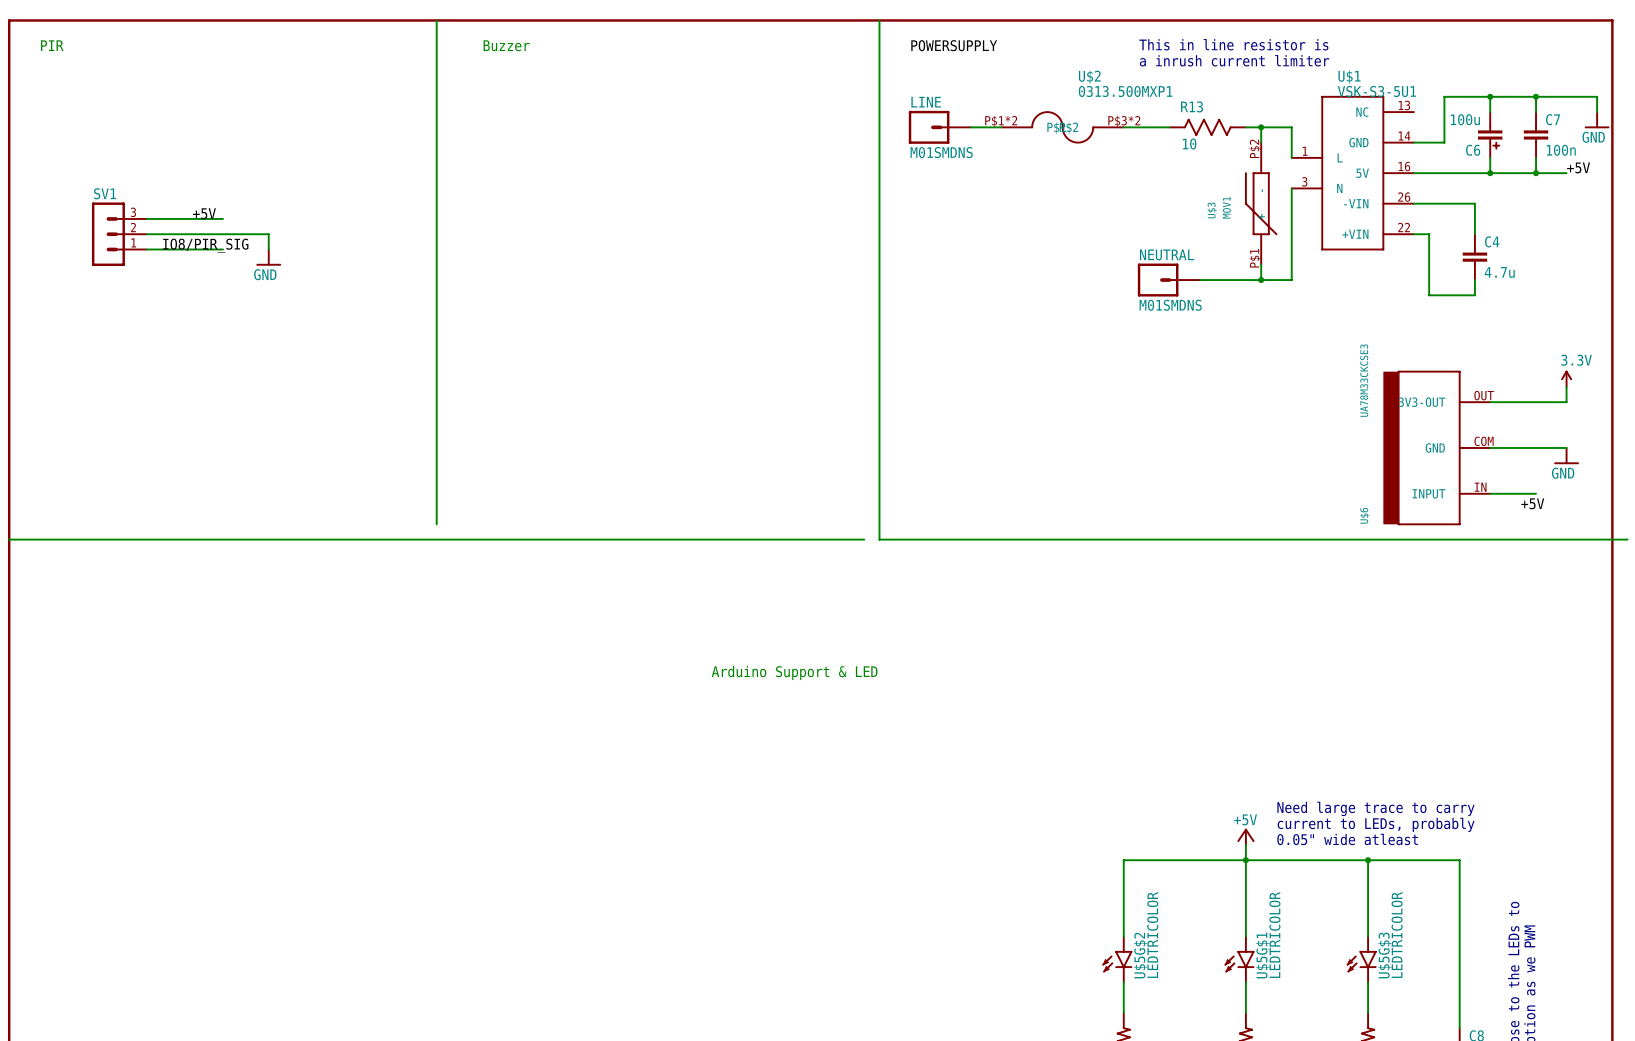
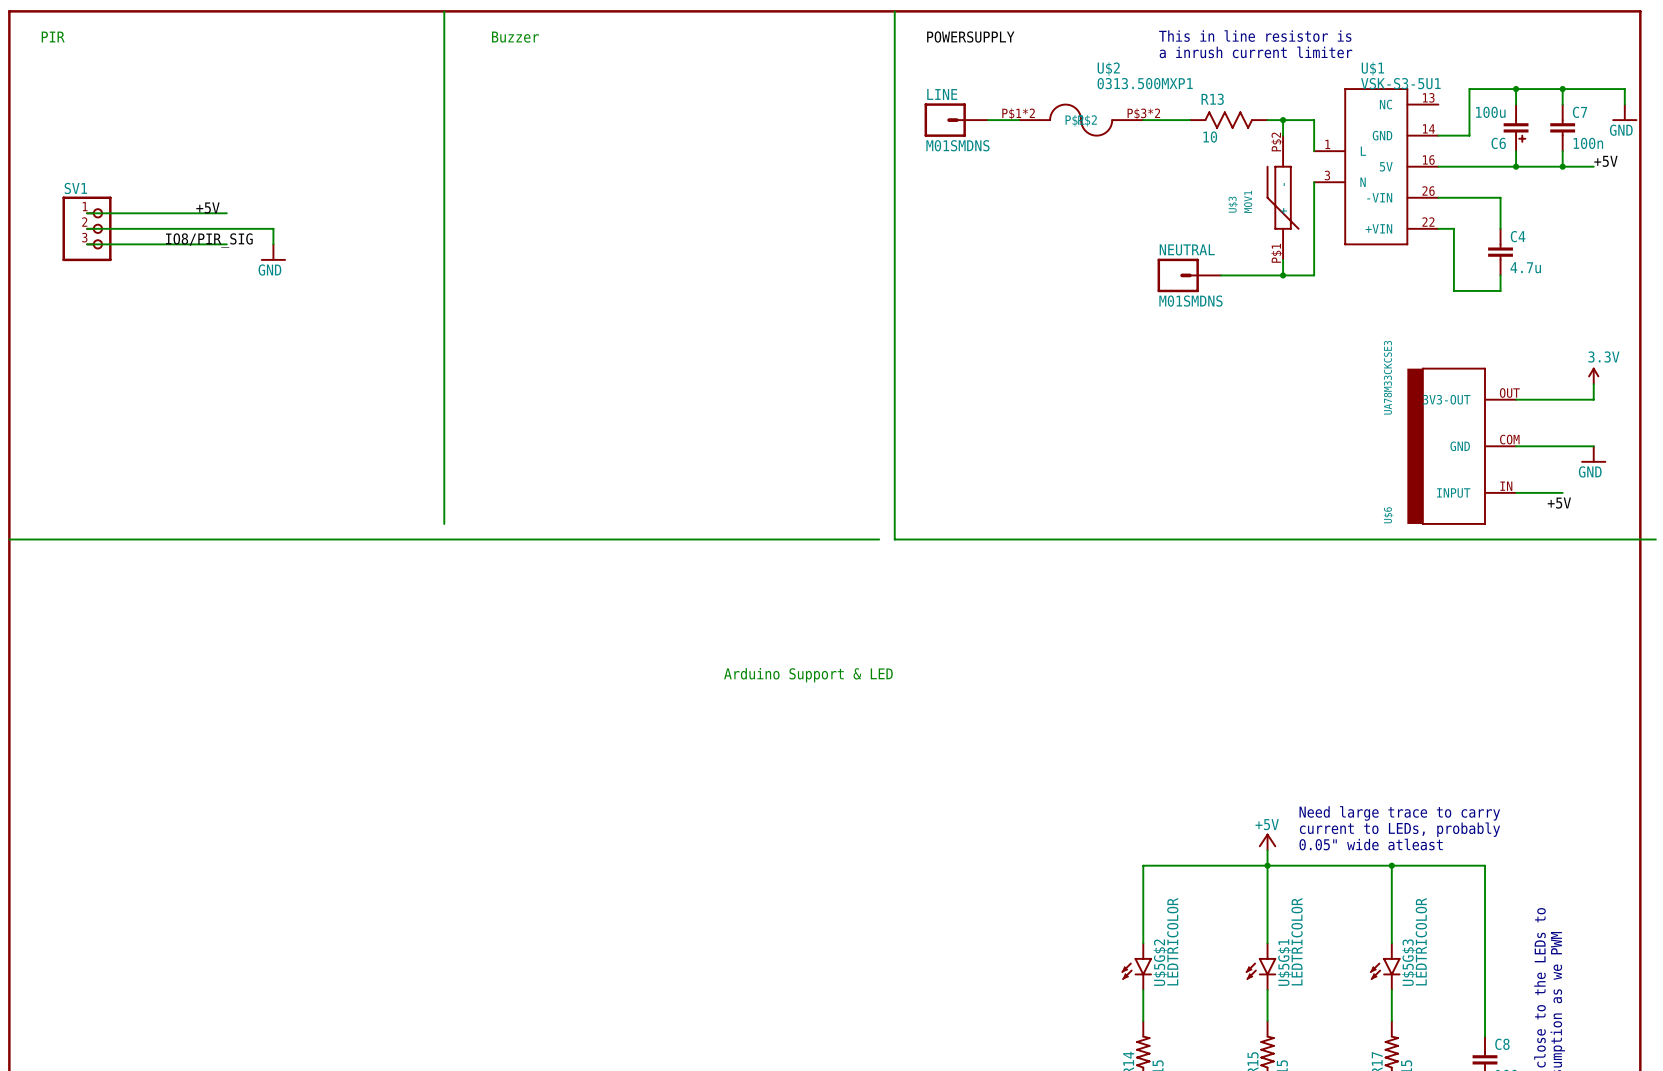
SV1 symbol: [91, 202, 147, 266] -> [62, 196, 112, 262]

